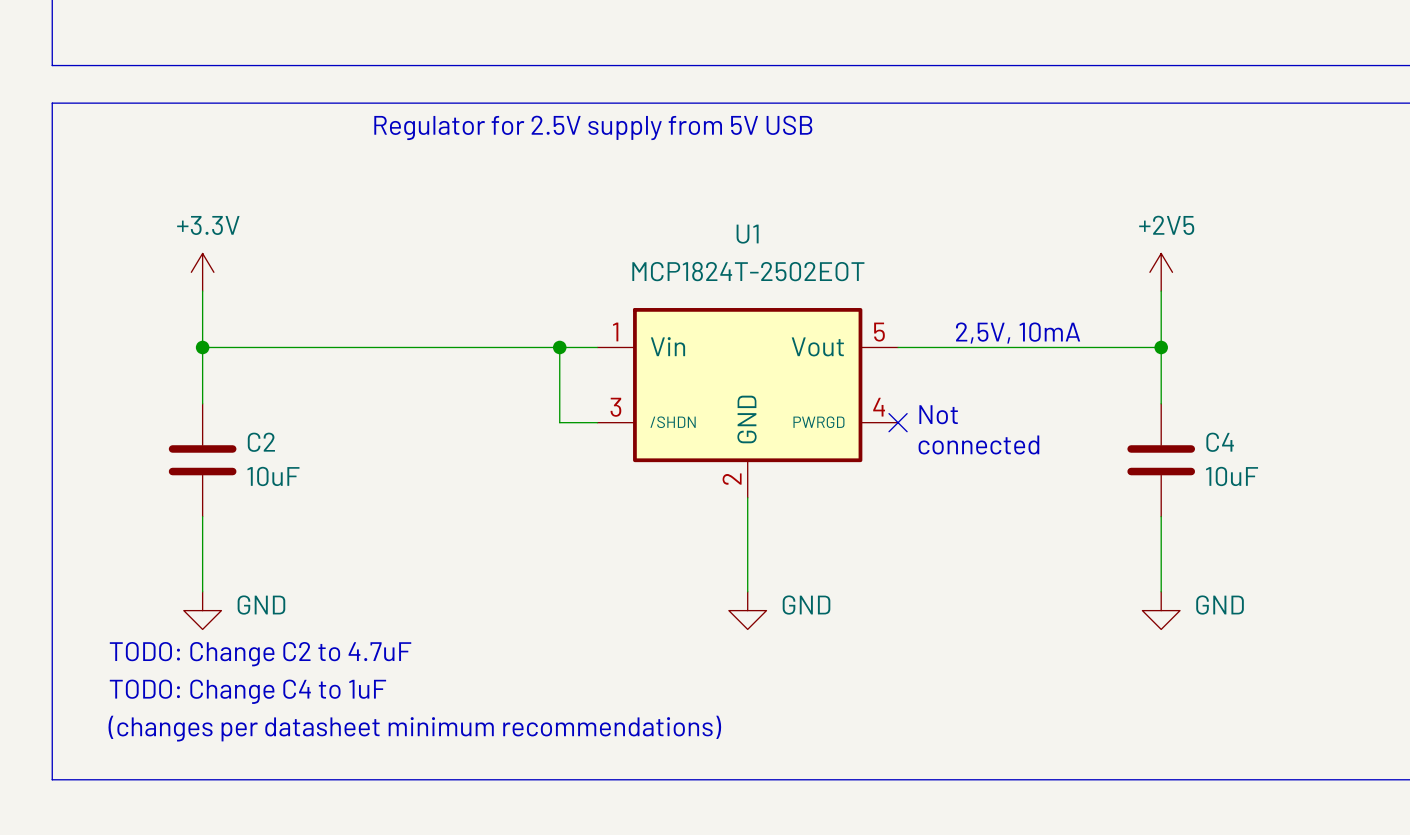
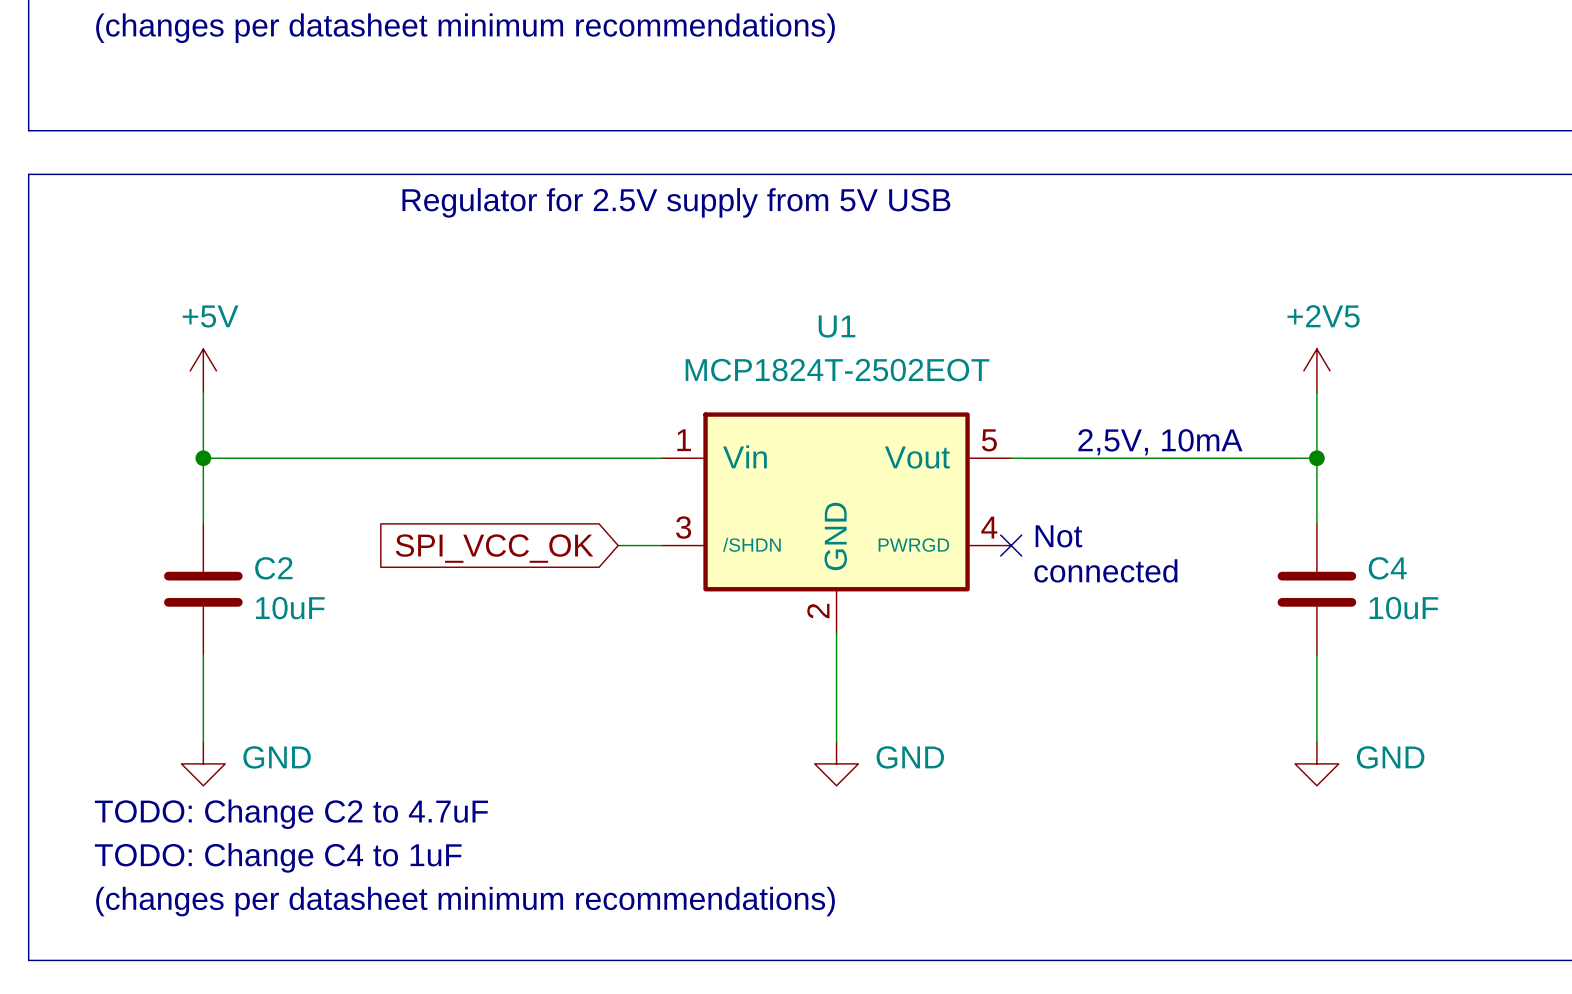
power symbol: +3.3V (202, 272) -> +5V (203, 370)
wire: (559, 347) (559, 422) -> none
junction: (559, 347) -> none
global label: none -> SPI_VCC_OK (494, 548)

